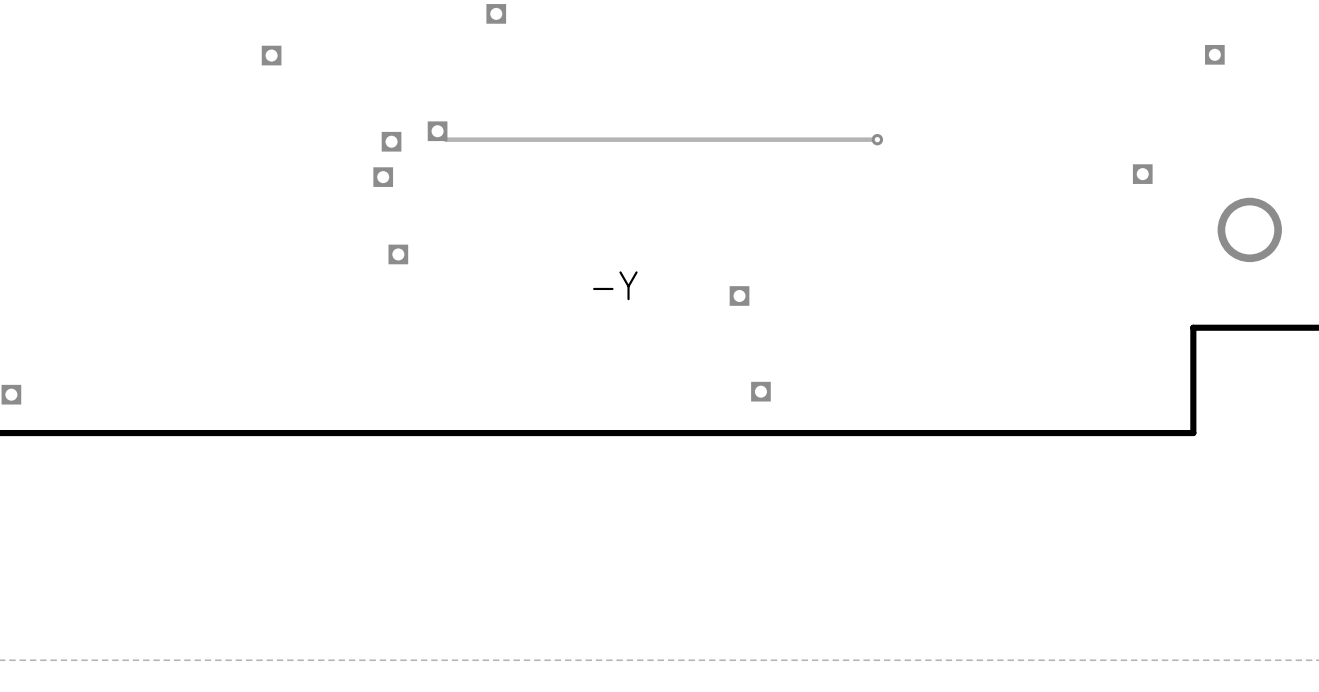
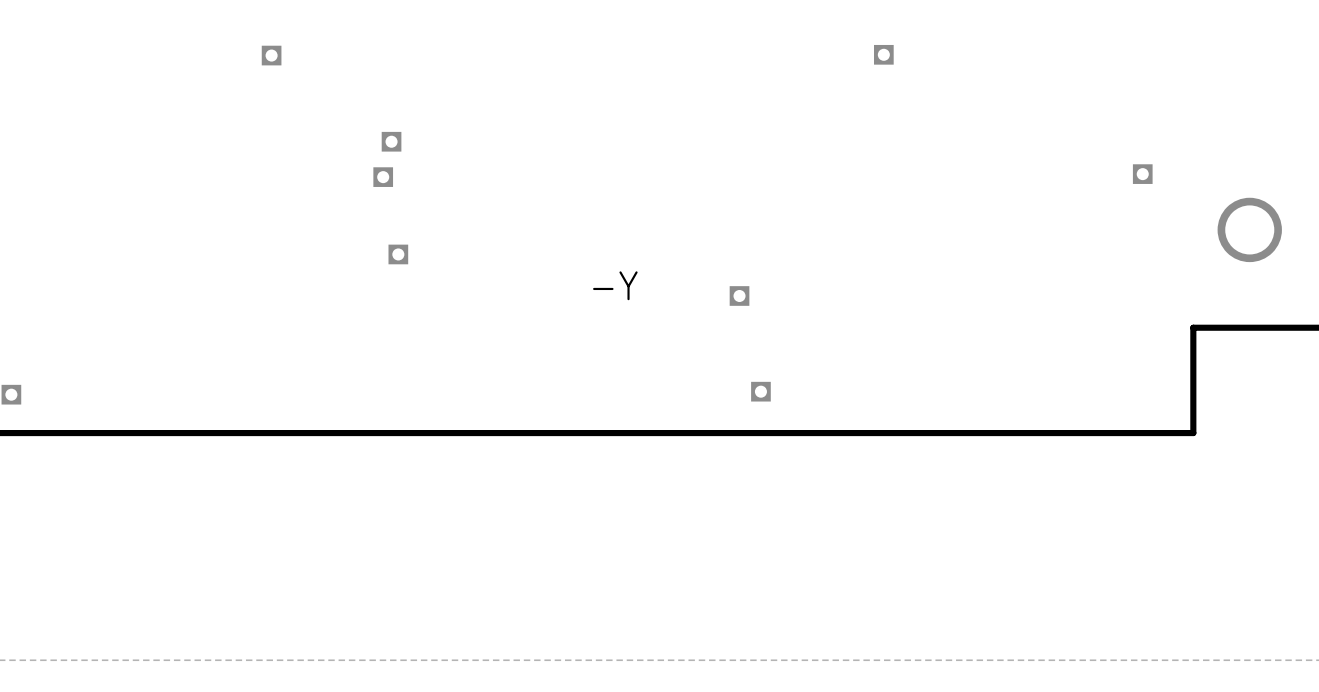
part: (496, 13) -> none
part: none -> (883, 54)
part: (1214, 54) -> none
track: (437, 131) (446, 139) (877, 139) -> none
part: (437, 131) -> none
via: (877, 139) -> none

